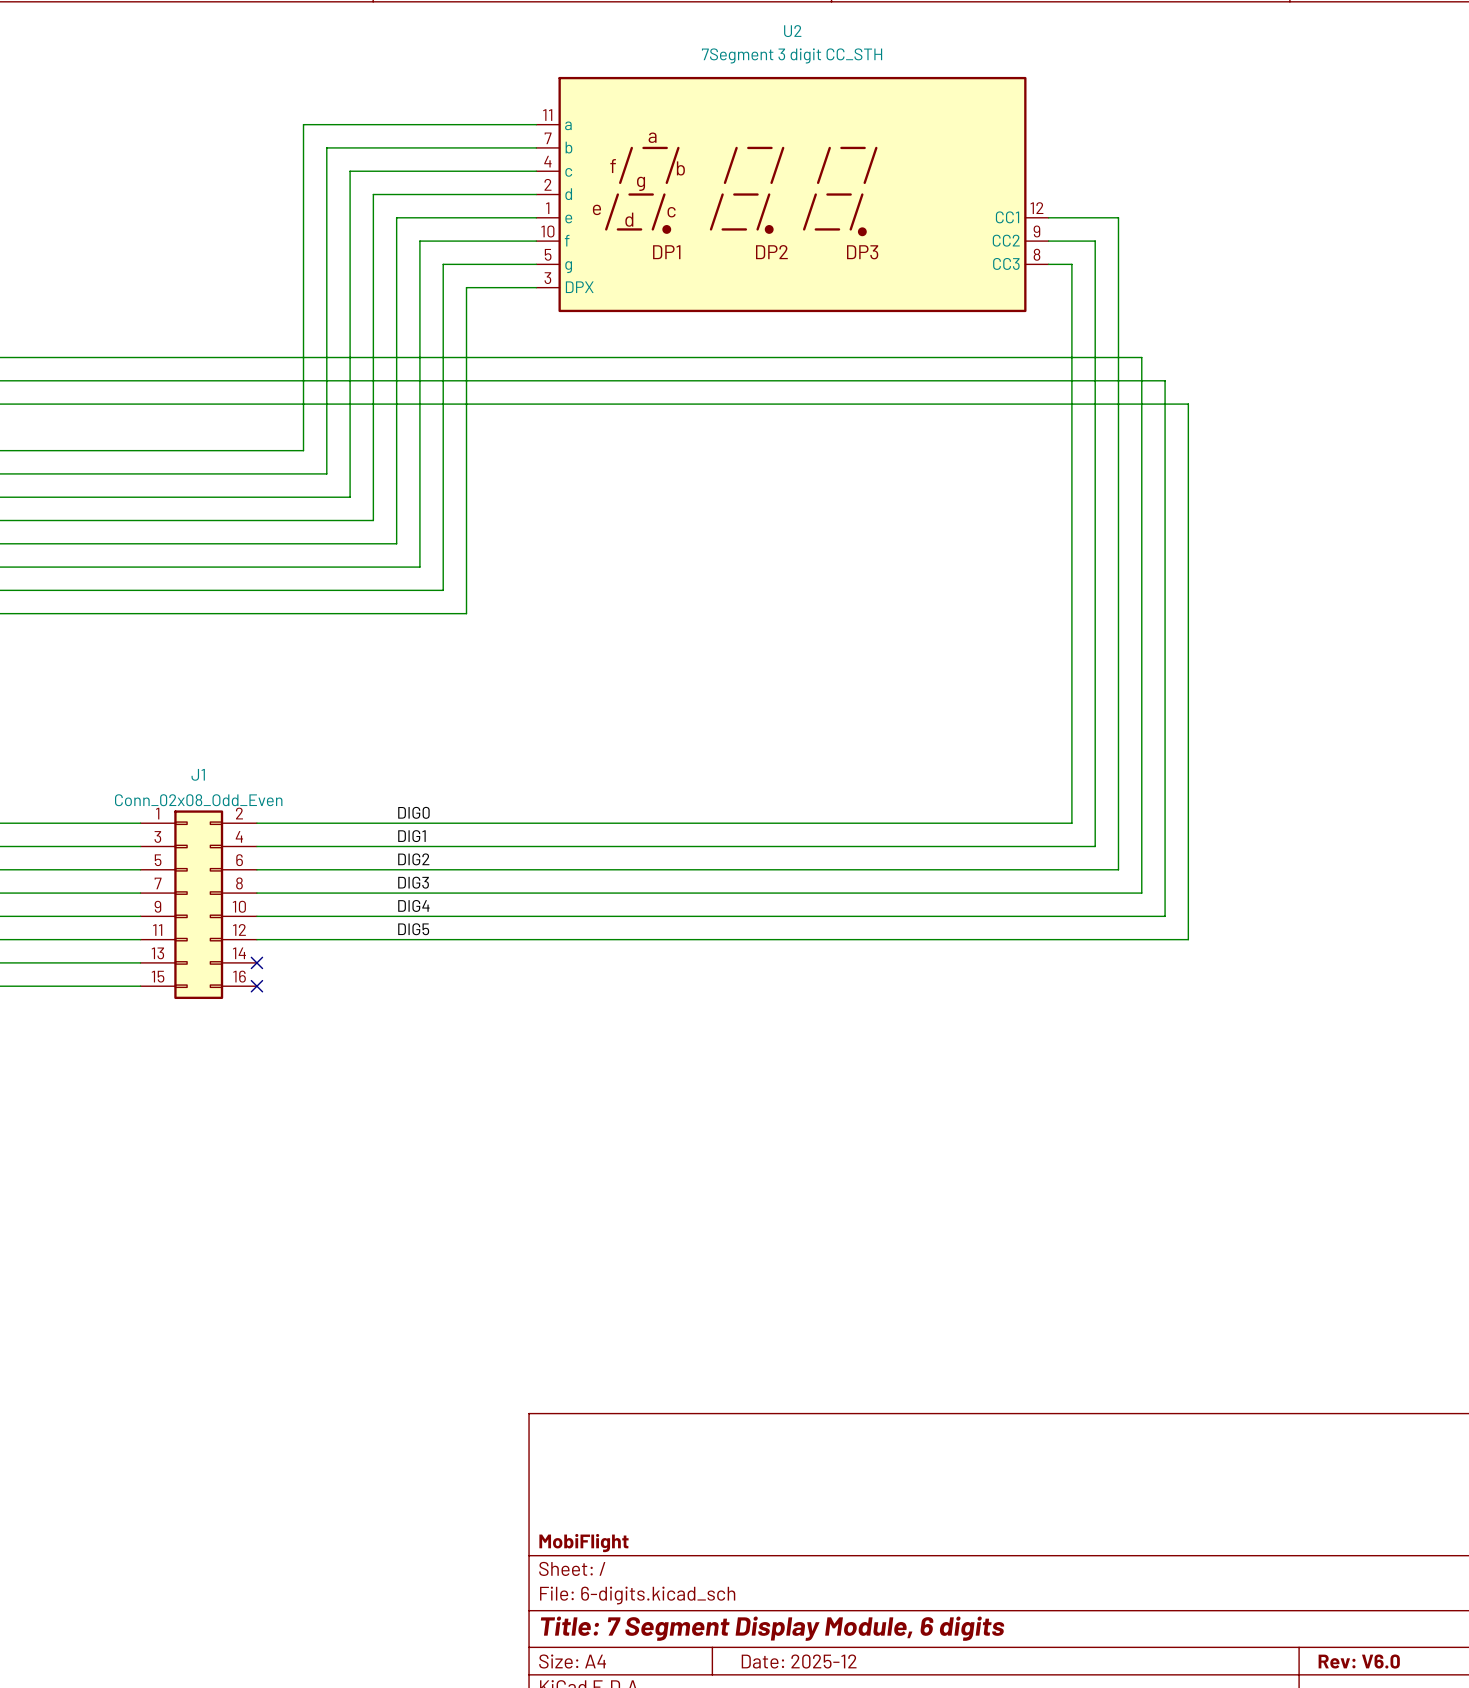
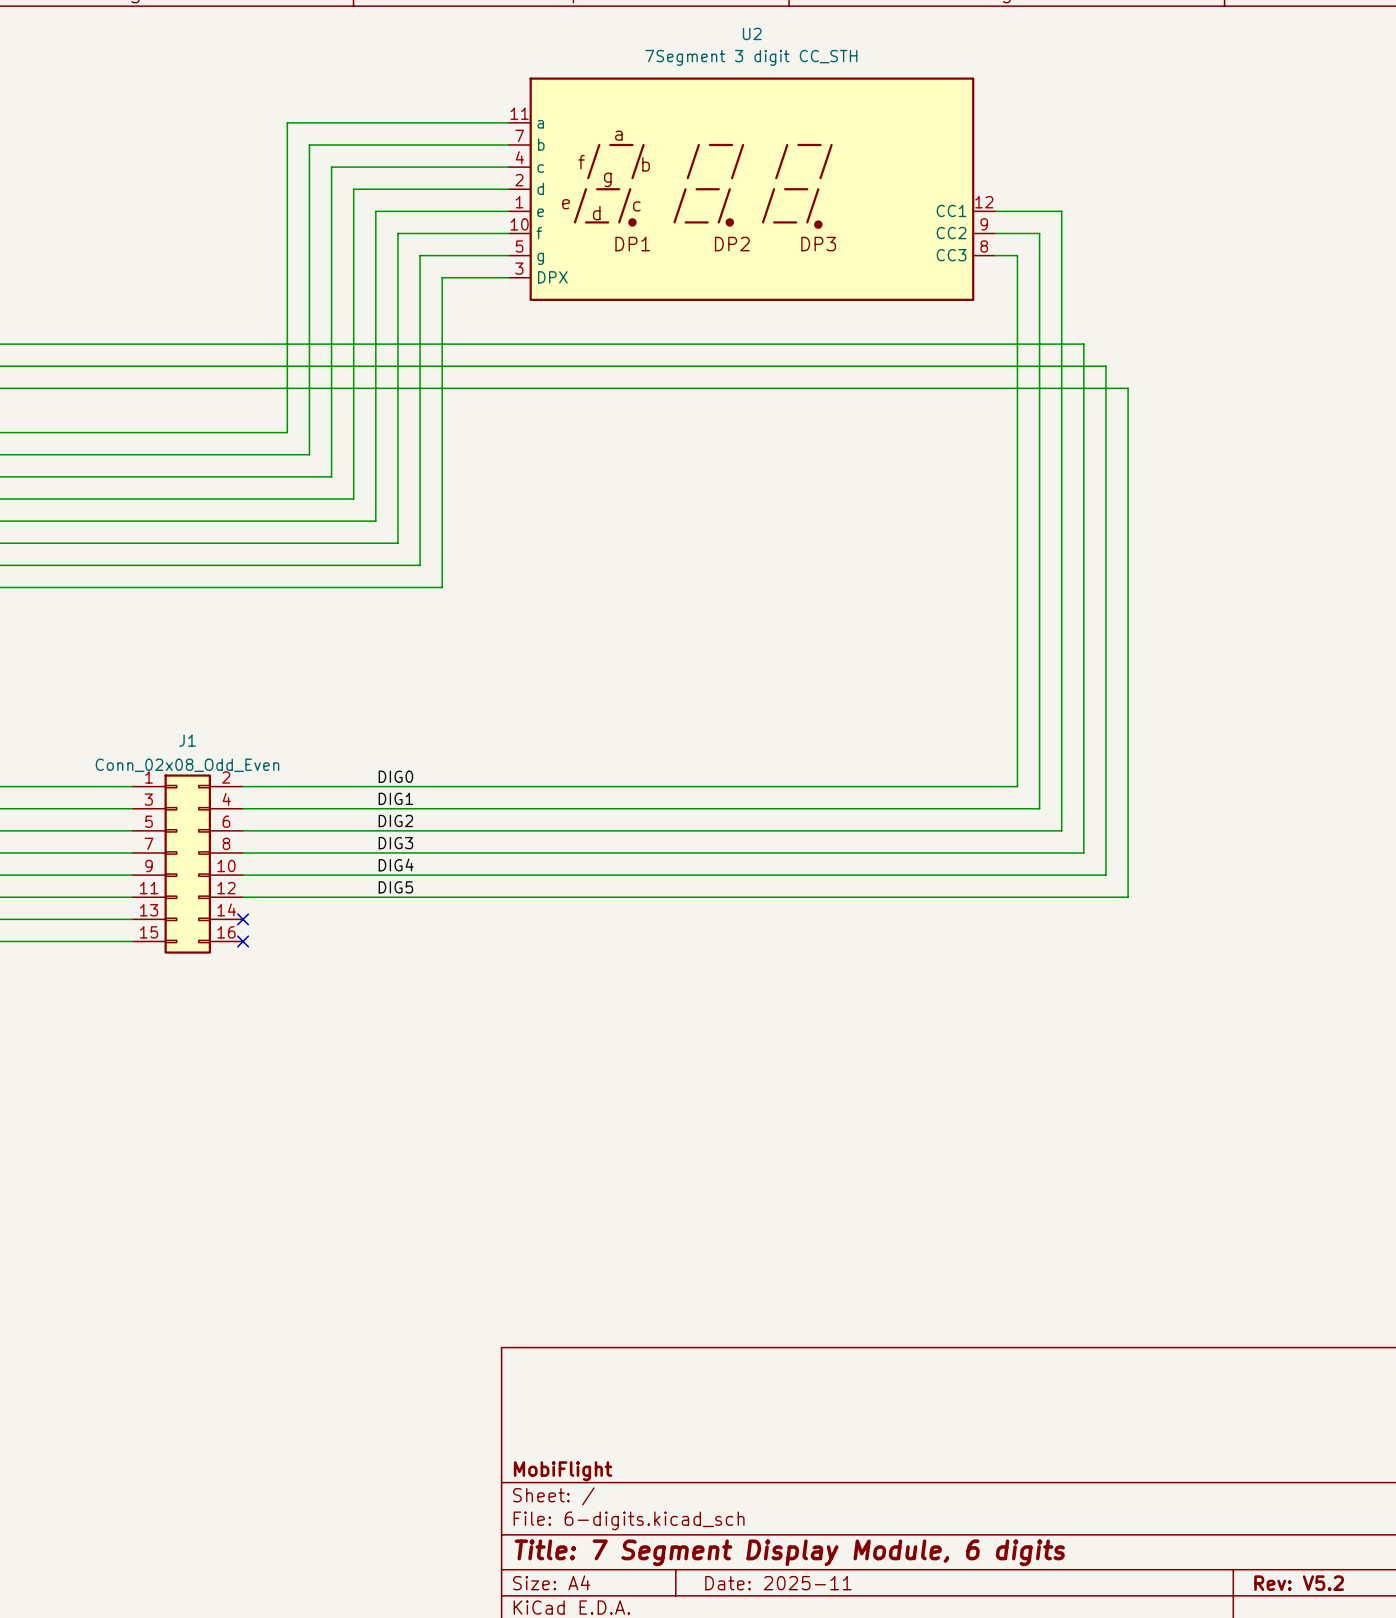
title block: Date: 2025-12 (799, 1661) -> Date: 2025-11 (778, 1583)
title block: Rev: V6.0 (1359, 1661) -> Rev: V5.2 (1299, 1583)

